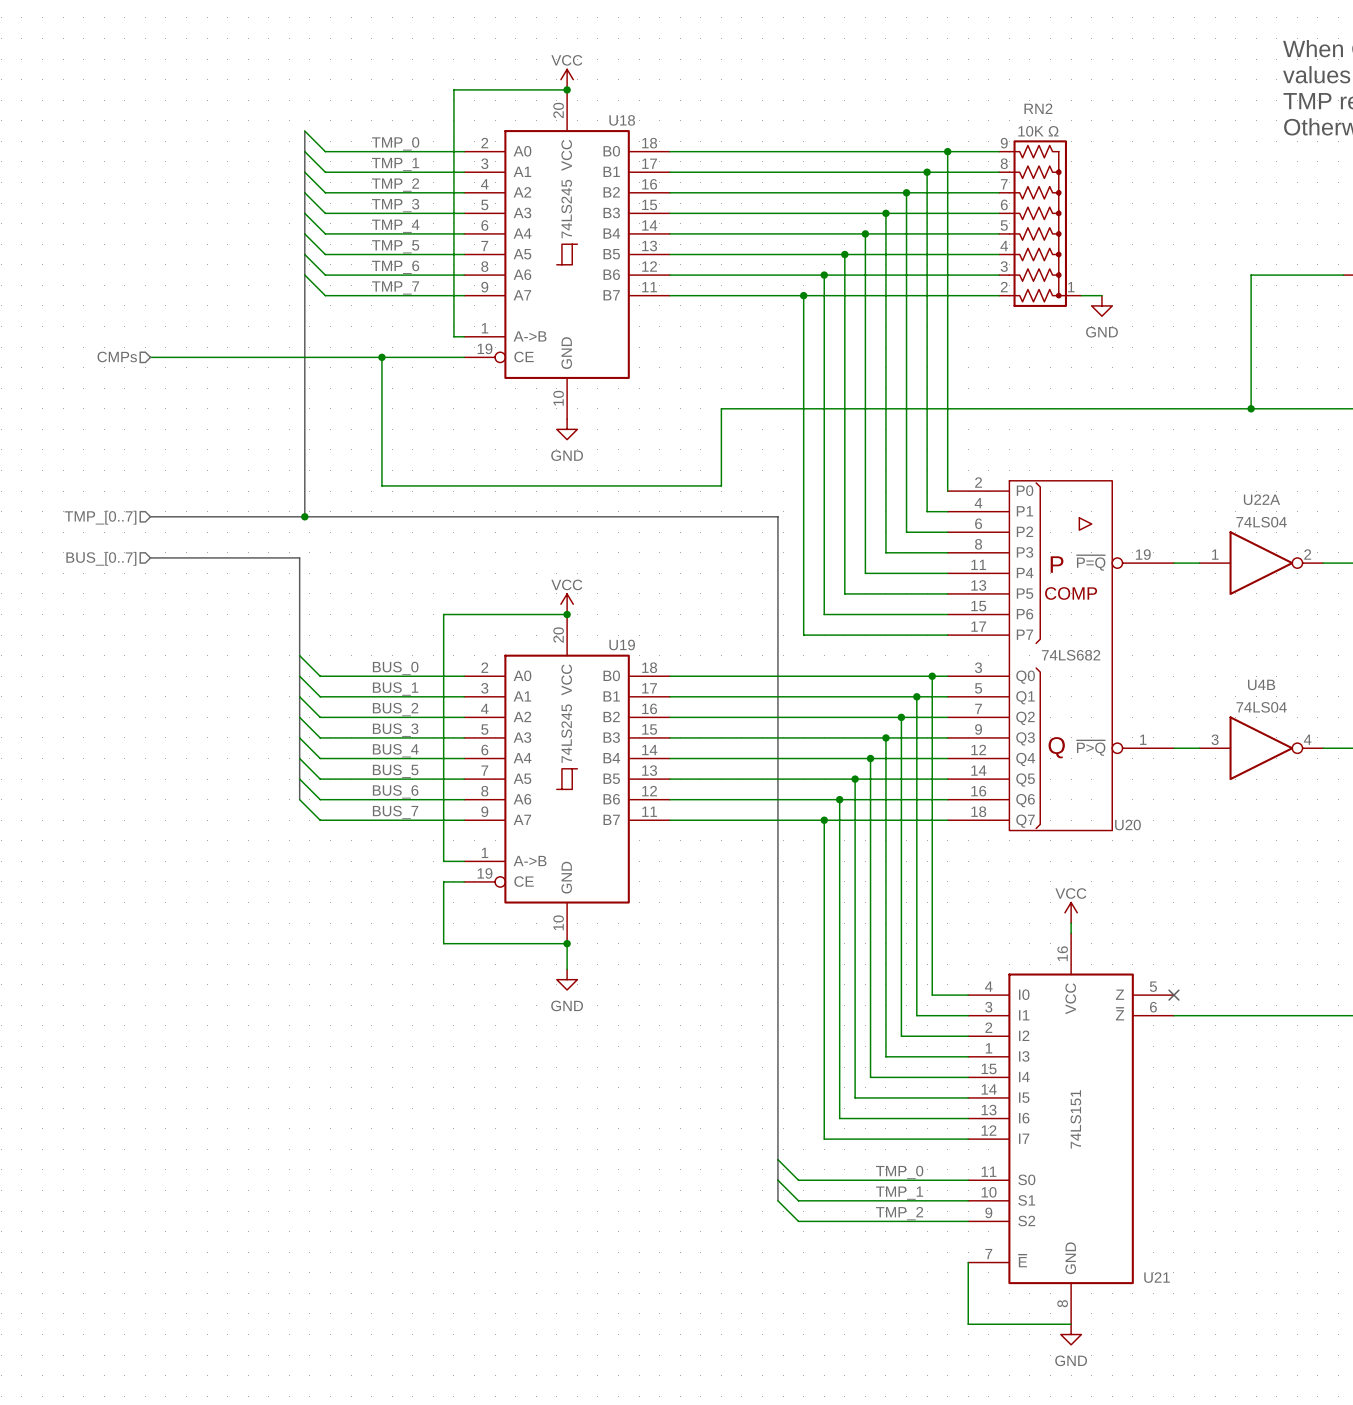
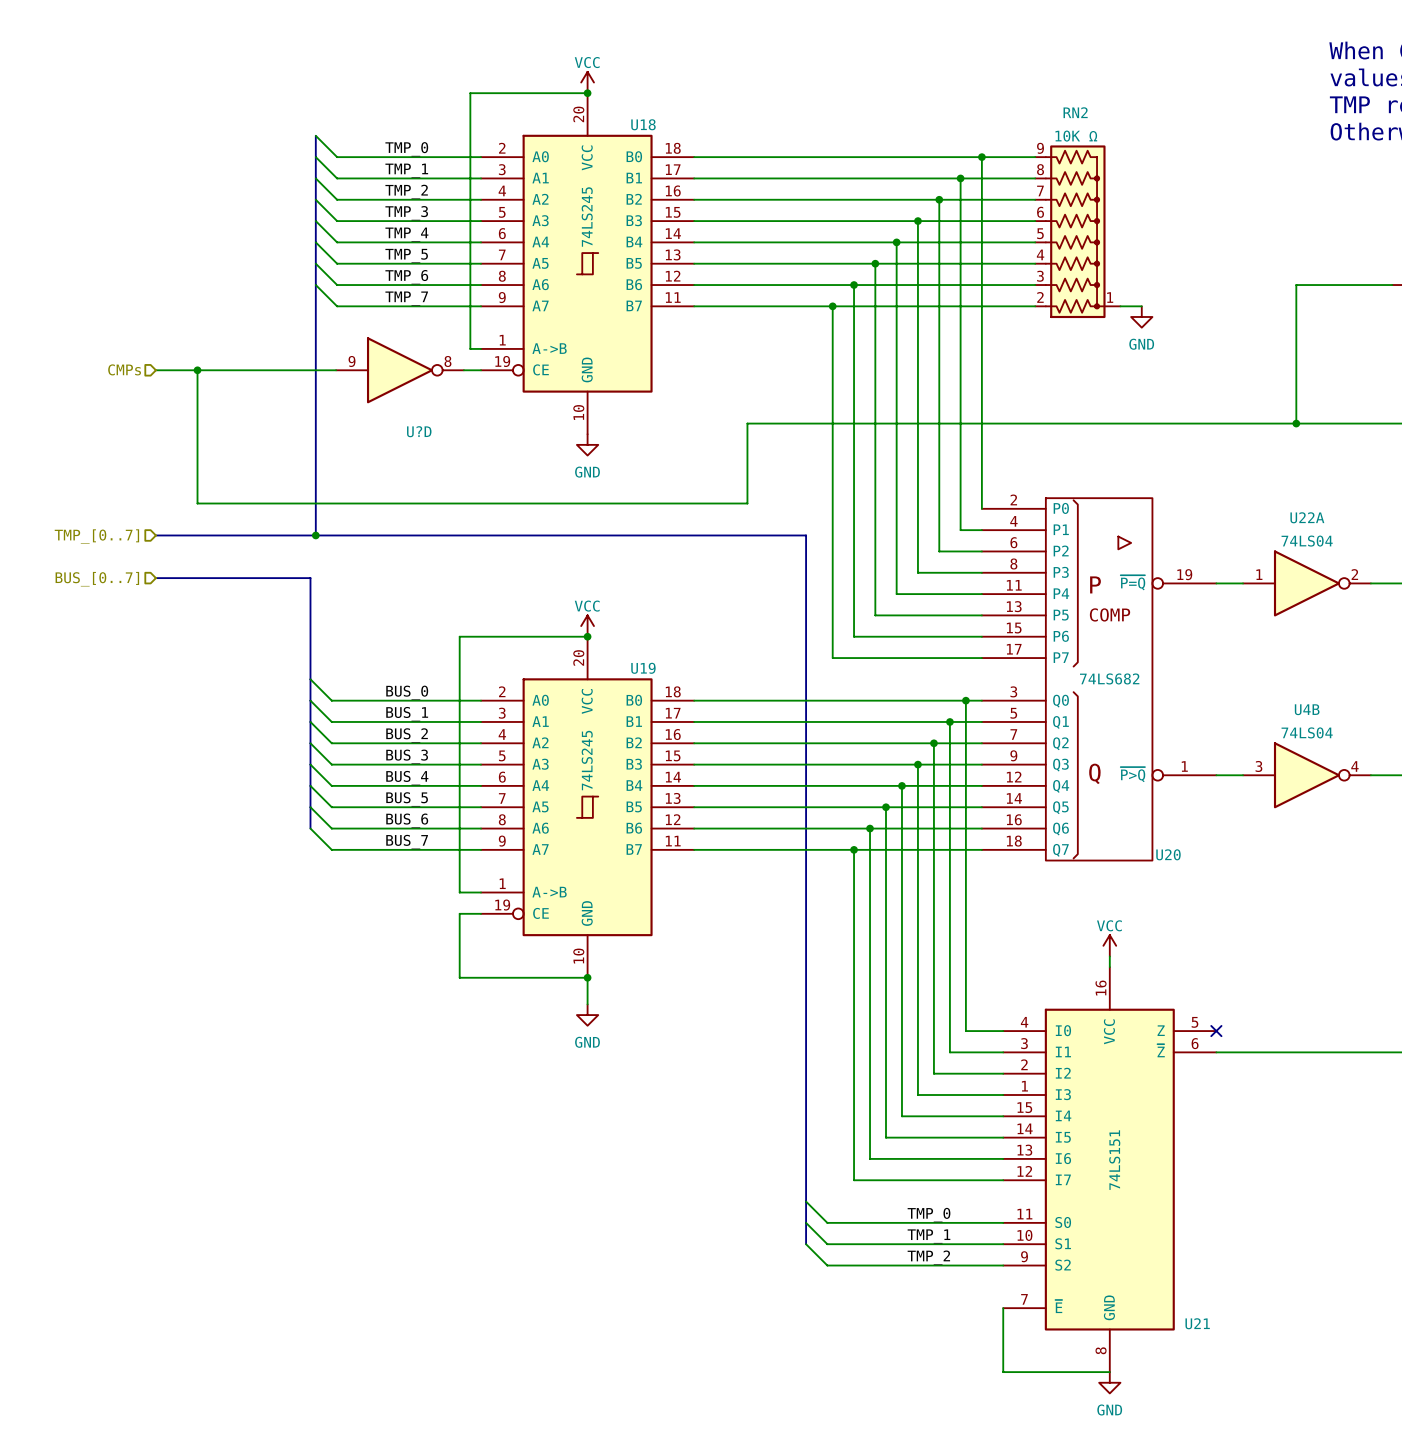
junction: none -> (197, 370)
wire: (381, 357) (381, 485) -> (197, 370) (197, 503) (395, 503)
junction: (381, 357) -> none
U?D: none -> (400, 370)

